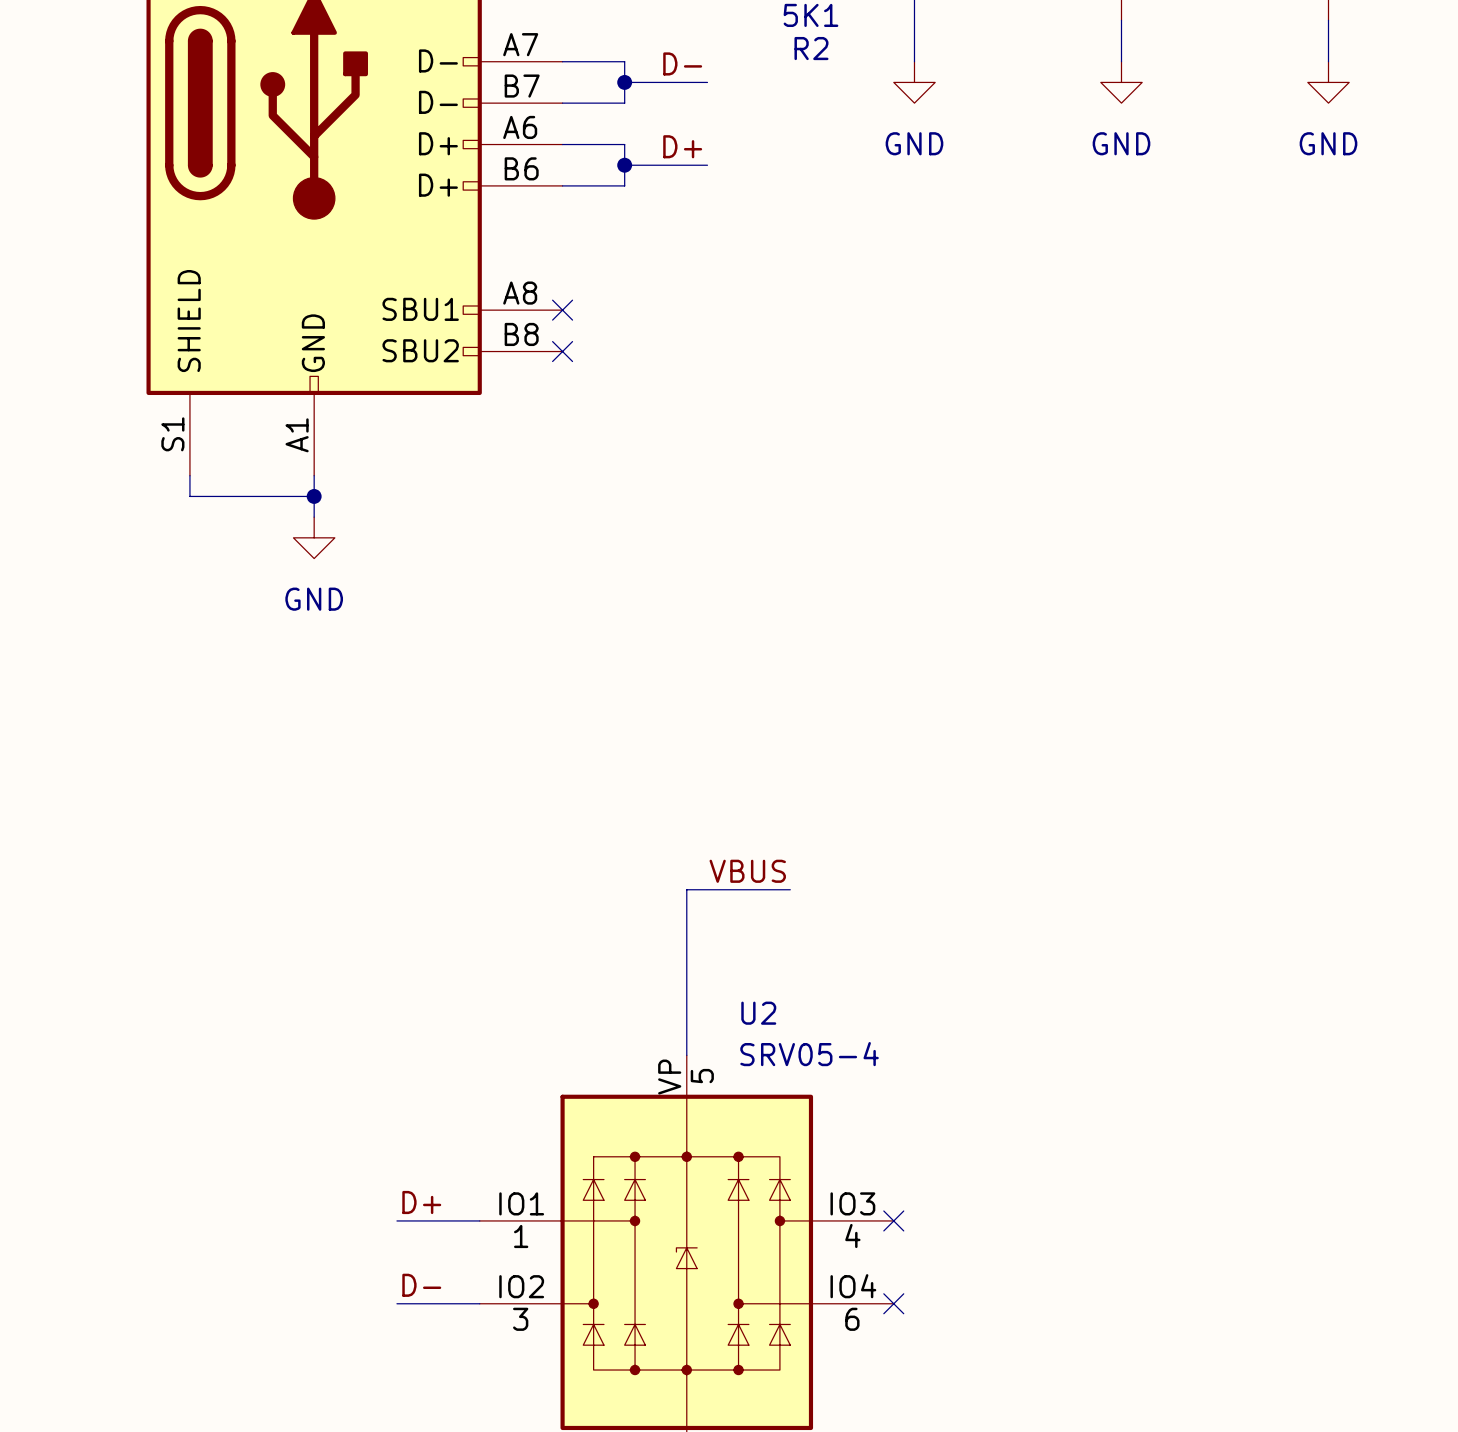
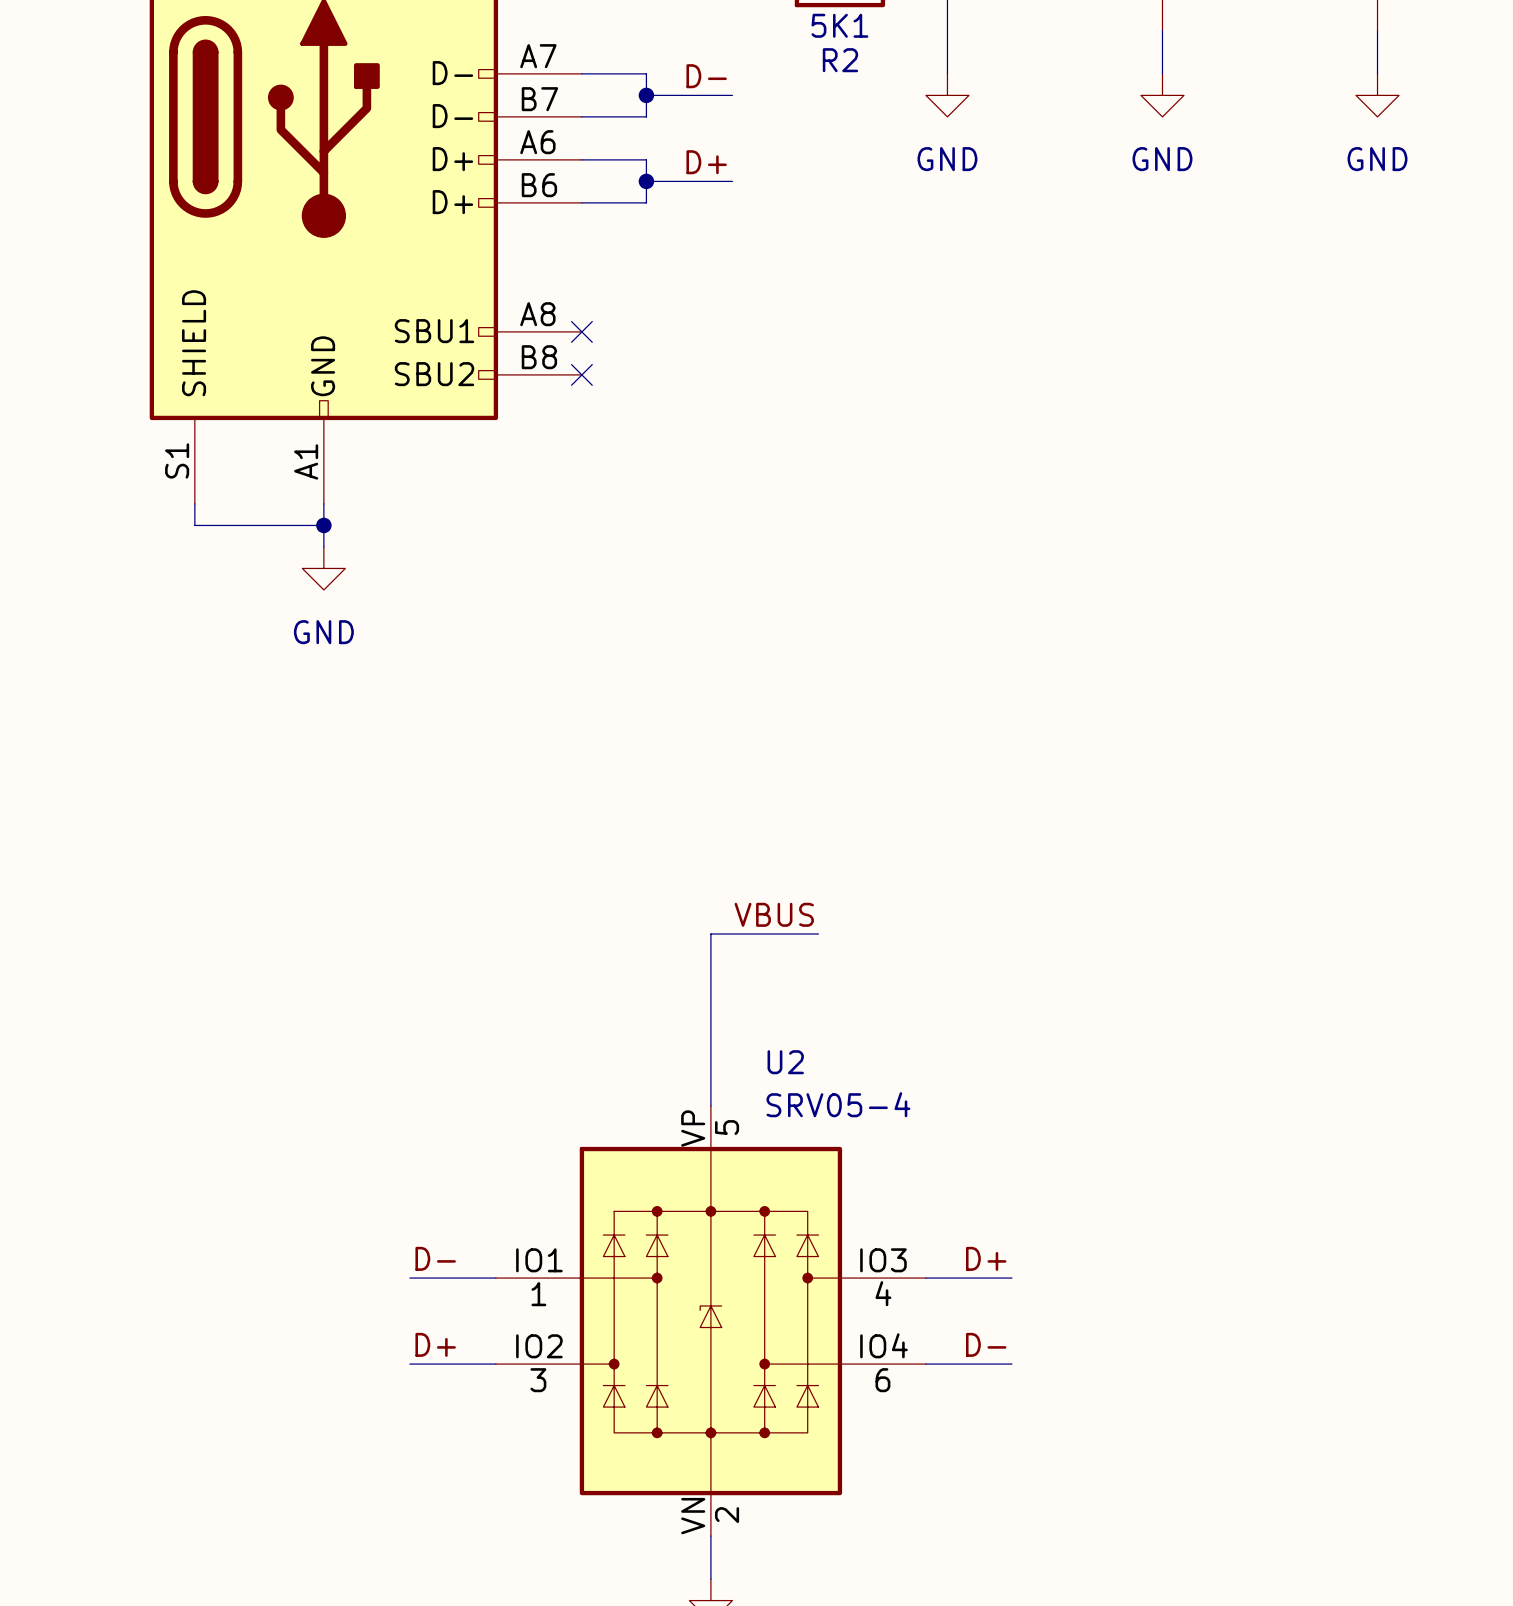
label: D+ (421, 1202) -> D- (435, 1258)
label: none -> D+ (986, 1258)
wire: none -> (925, 1278) (1011, 1278)
no-connect mark: (893, 1220) -> none
label: D- (421, 1285) -> D+ (435, 1344)
label: none -> D- (986, 1344)
wire: none -> (925, 1364) (1011, 1364)
no-connect mark: (893, 1303) -> none

